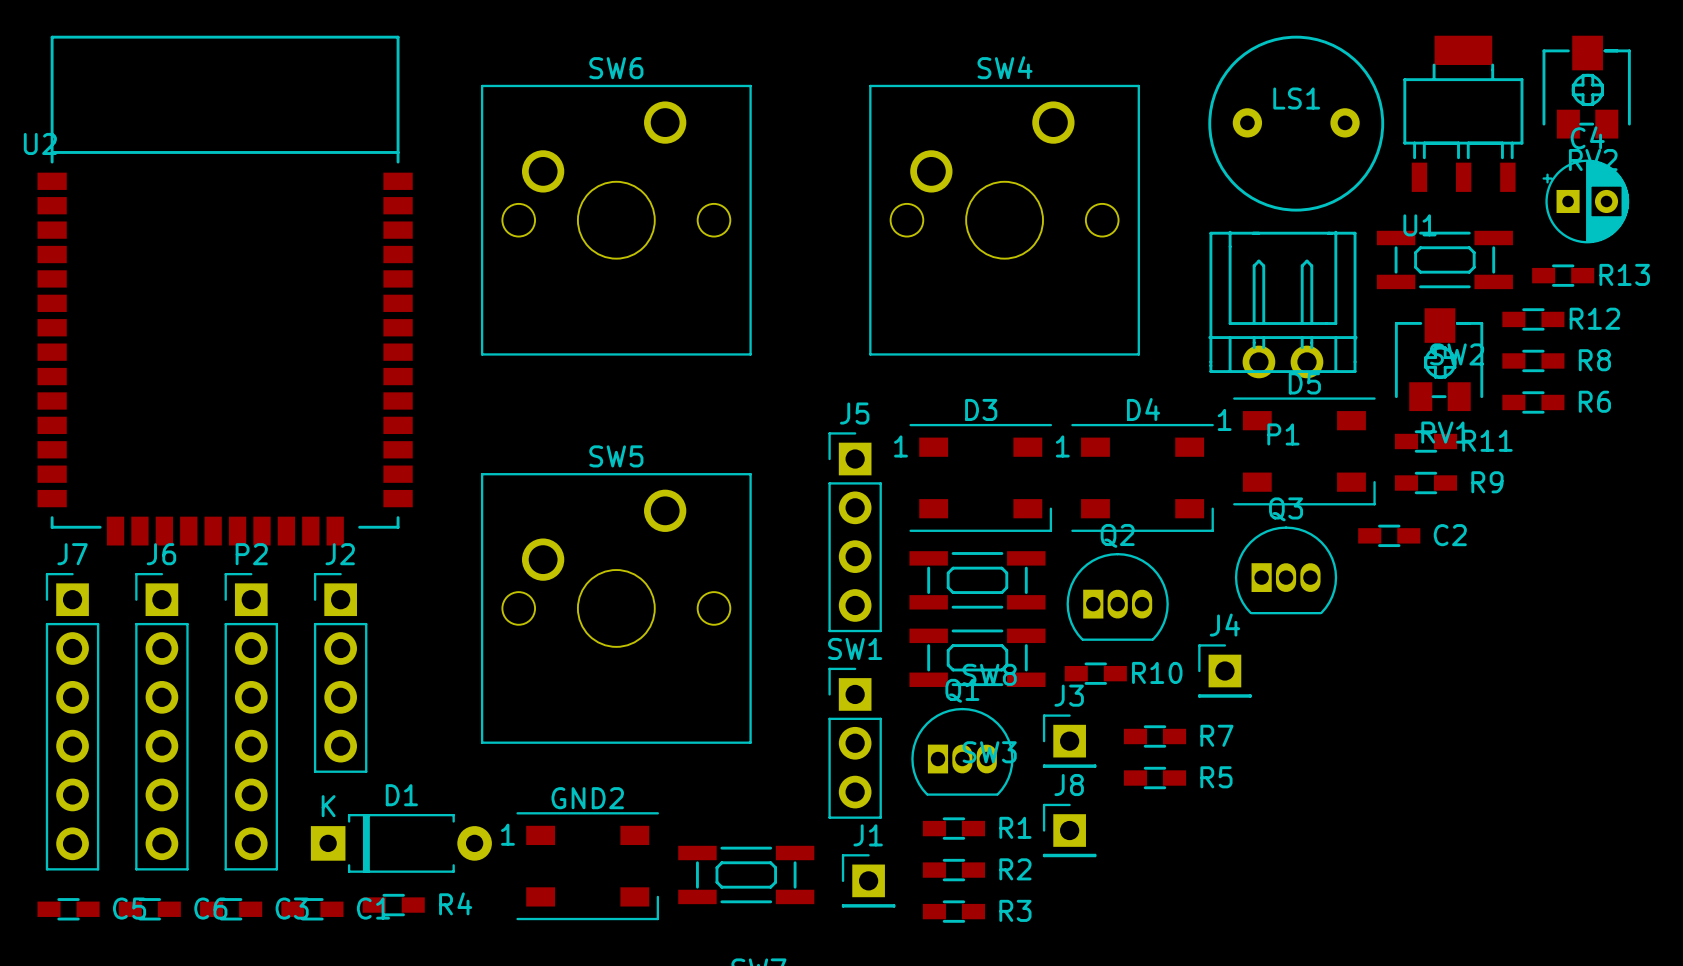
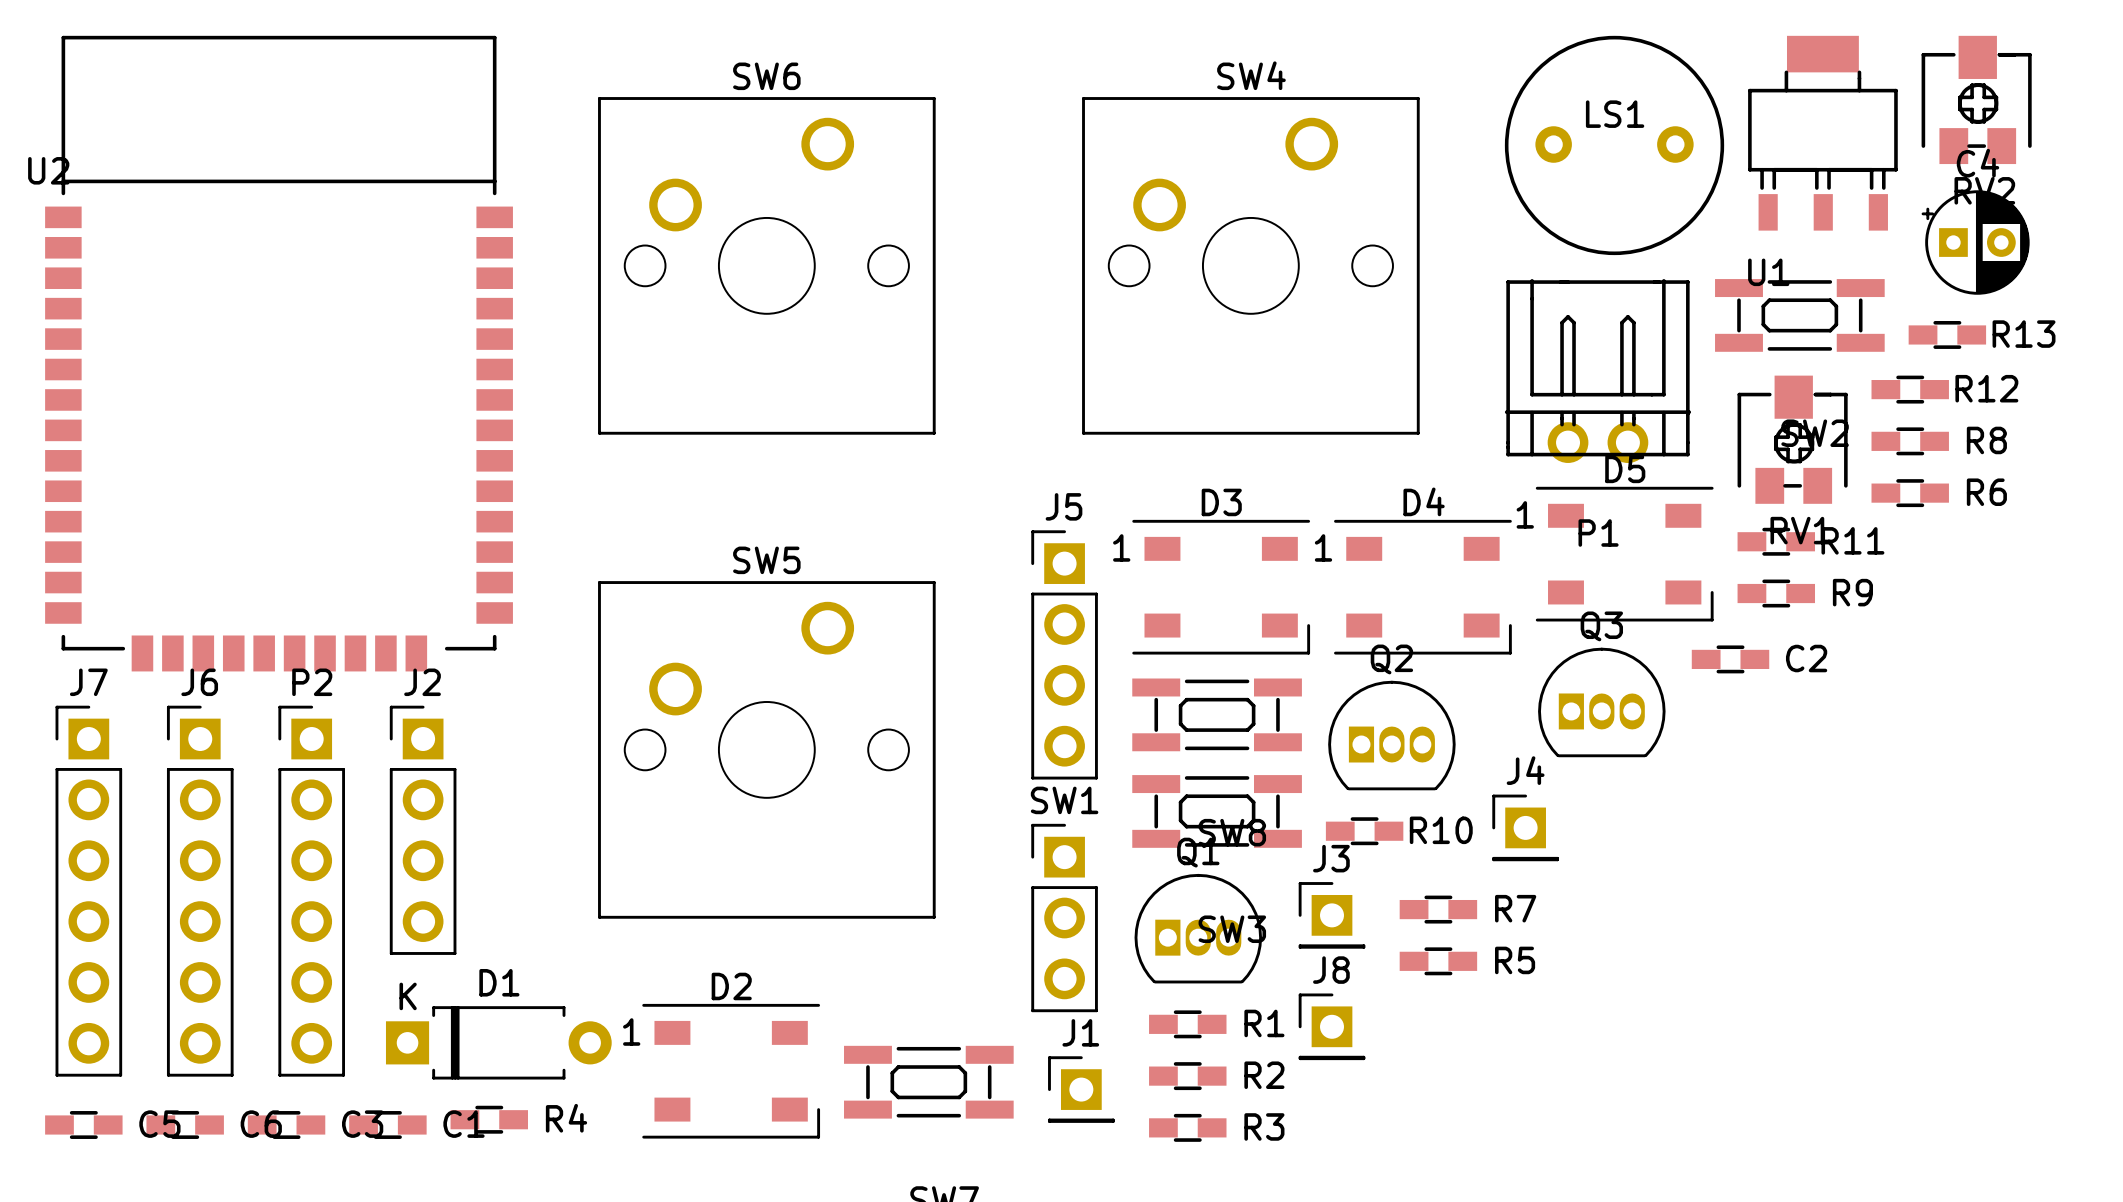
GND2 name: GND2 (587, 798) -> D2 (731, 986)

